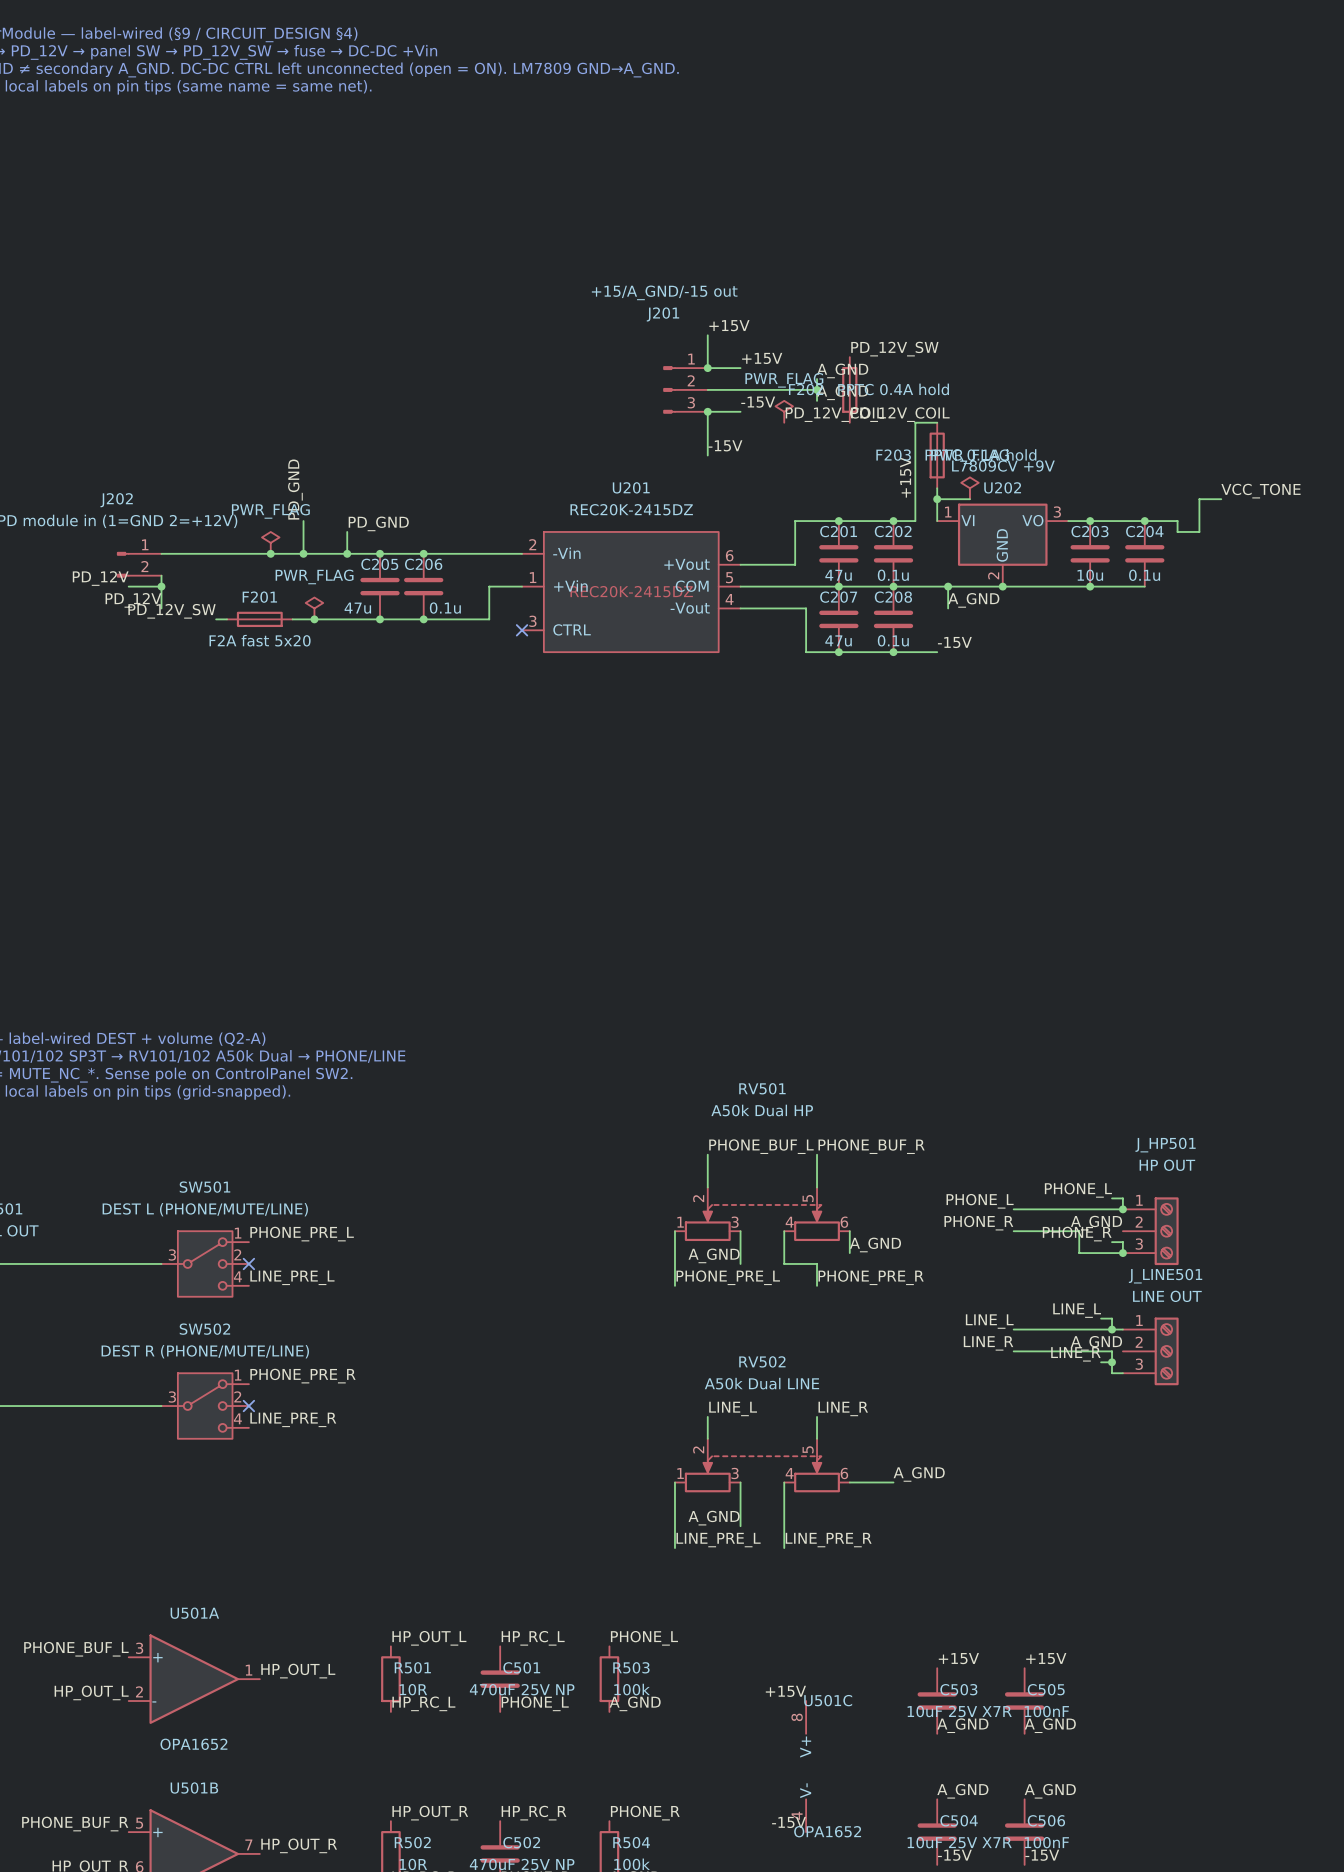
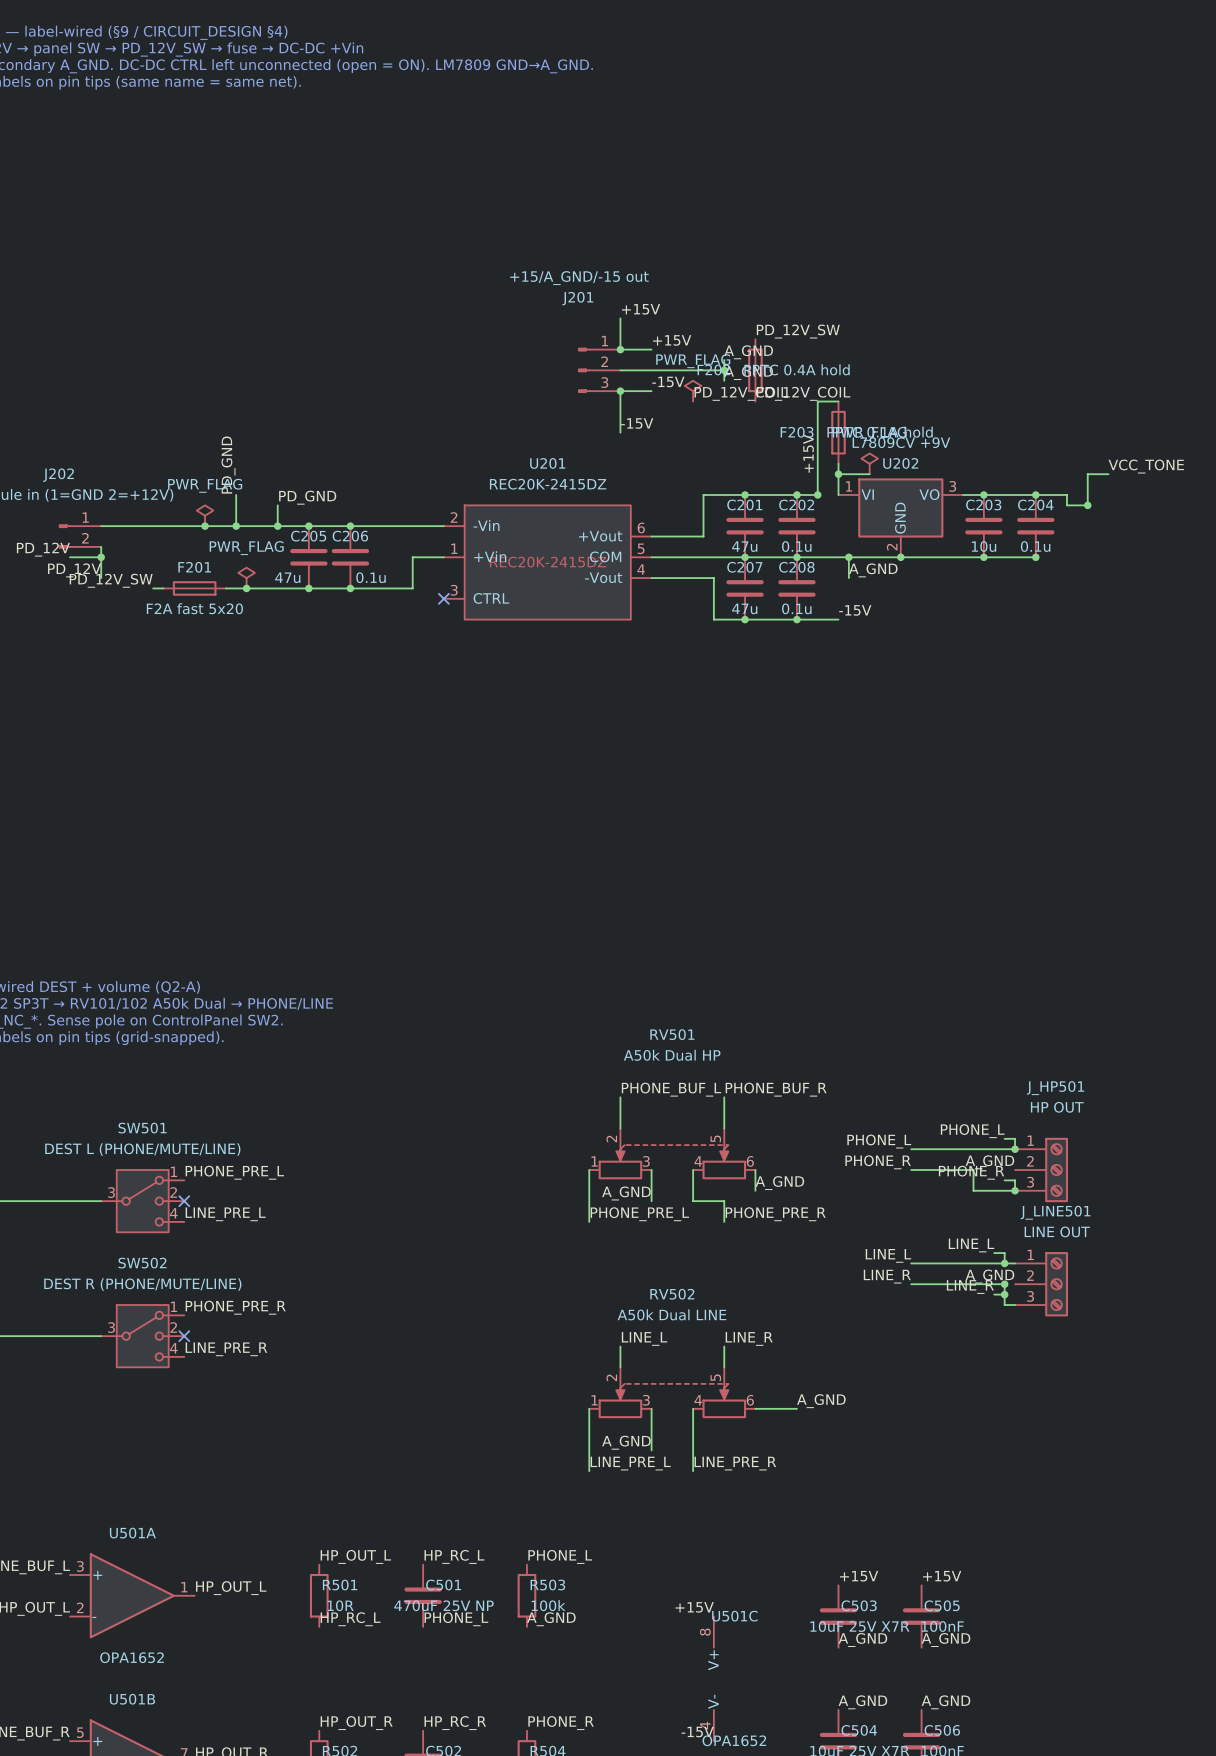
junction: none -> (817, 494)
junction: none -> (1087, 505)
junction: none -> (1035, 557)
junction: none -> (1004, 1284)

